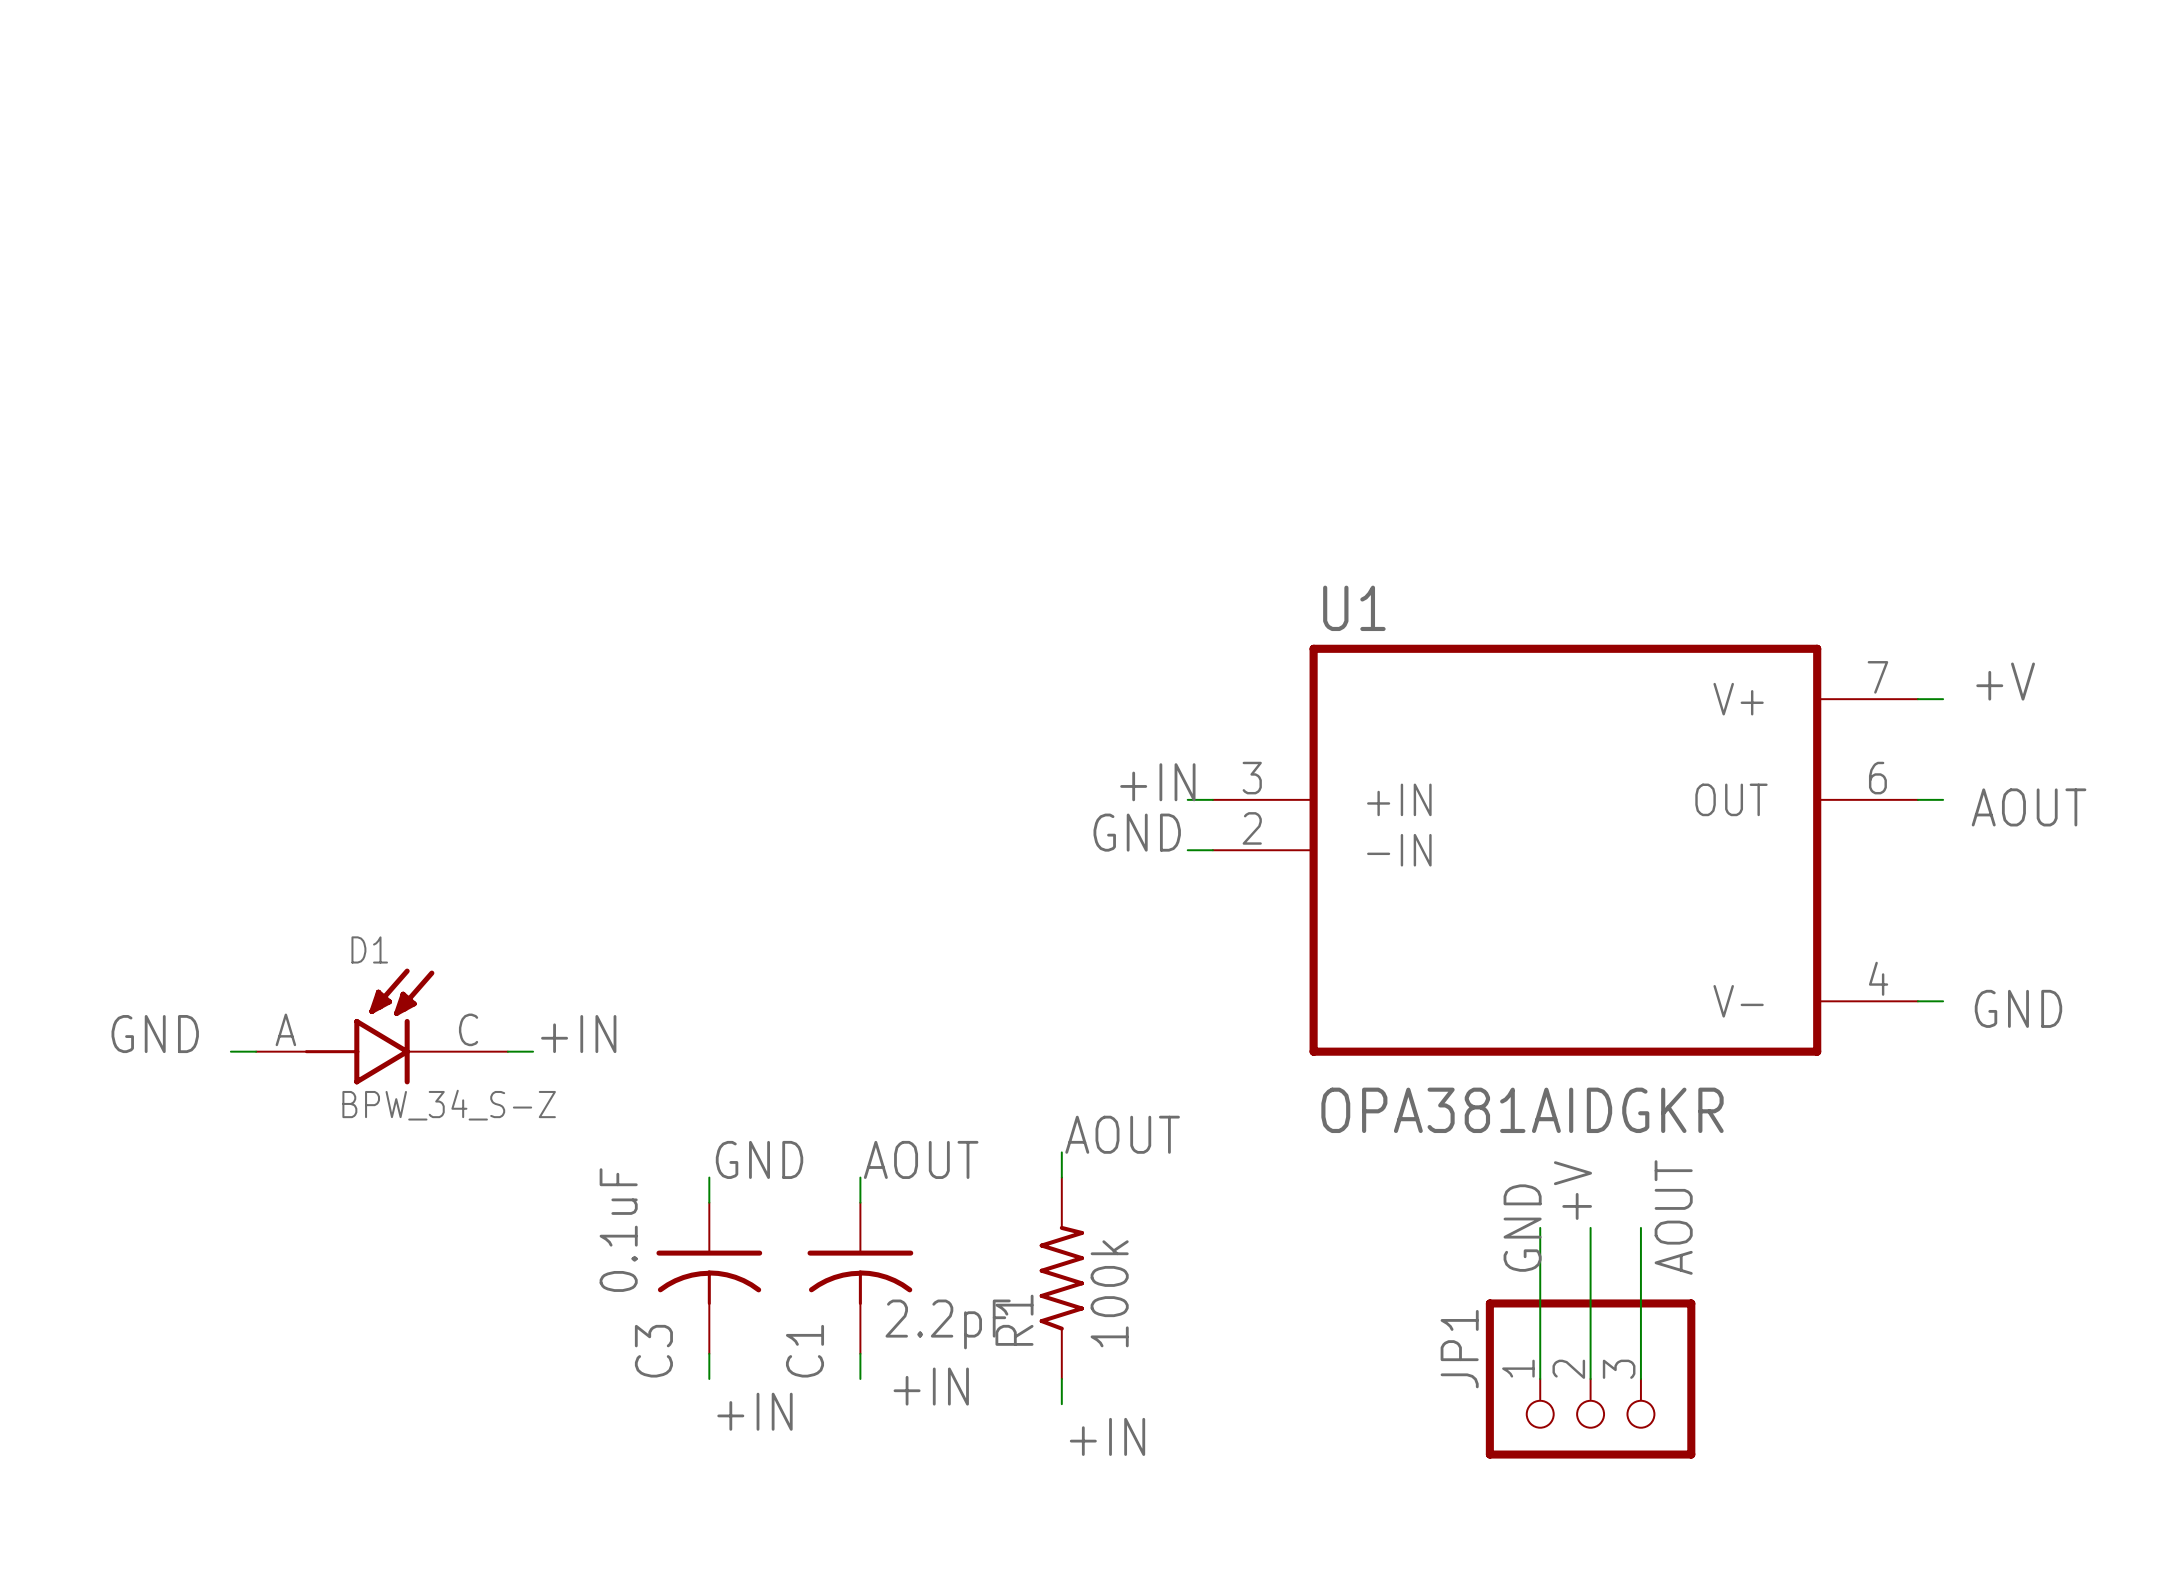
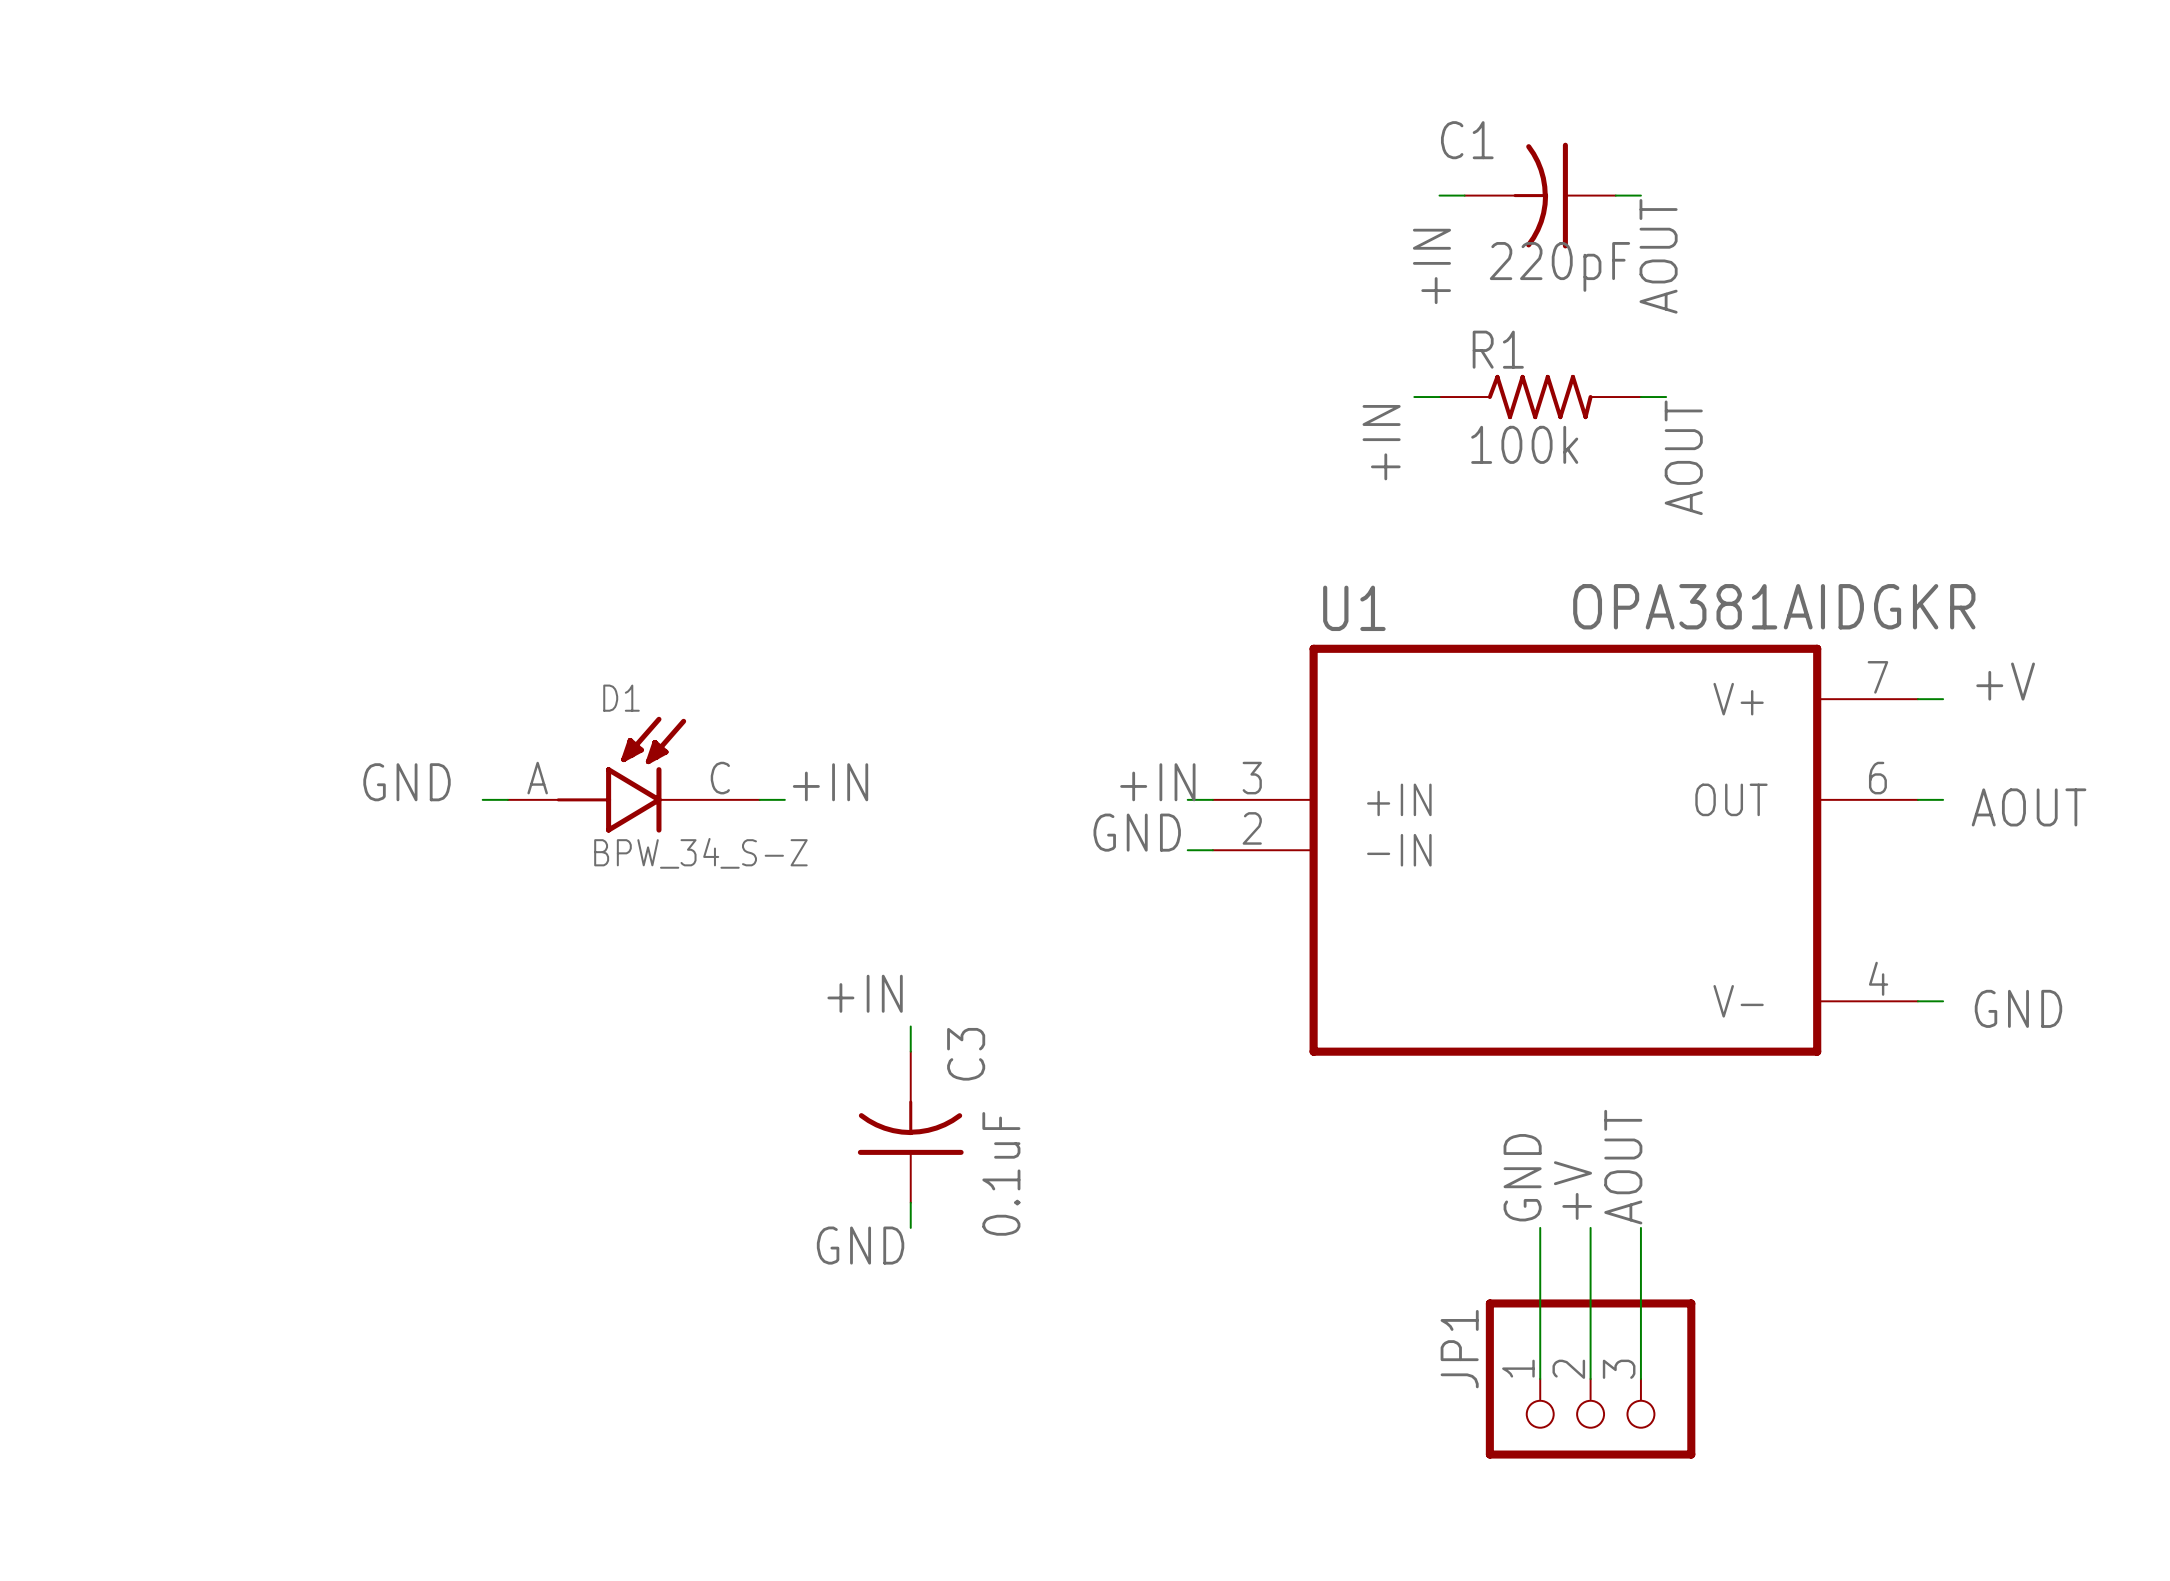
wire: none -> (1439, 195) (1464, 195)
wire: none -> (1615, 195) (1640, 195)
label: none -> AOUT (1658, 256)
label: none -> +IN (1431, 266)
wire: none -> (1414, 397) (1439, 397)
wire: none -> (1640, 397) (1666, 397)
label: none -> +IN (1381, 442)
label: none -> AOUT (1683, 457)
label: none -> GND (407, 782)
label: none -> +IN (830, 782)
label: none -> +IN (865, 993)
D1 position: (381, 1026) -> (633, 774)
label: GND (155, 1034) -> none
label: +IN (578, 1034) -> none
wire: (230, 1051) (256, 1051) -> (482, 799) (507, 799)
wire: (507, 1051) (533, 1051) -> (759, 799) (784, 799)
U1 value position: OPA381AIDGKR (1522, 1110) -> OPA381AIDGKR (1774, 606)
label: AOUT (1122, 1134) -> none
wire: (1061, 1152) (1061, 1177) -> none
label position: GND (759, 1159) -> GND (860, 1245)
label: AOUT (921, 1159) -> none
wire: (709, 1177) (709, 1202) -> none
wire: (860, 1177) (860, 1202) -> (910, 1026) (910, 1051)
label position: AOUT (1673, 1217) -> AOUT (1623, 1167)
label position: GND (1522, 1228) -> GND (1522, 1177)
C3 rotation: 0° (709, 1277) -> 180° (910, 1127)
C1 rotation: 0° (860, 1277) -> 90° clockwise (1540, 195)
C3 position: (709, 1278) -> (910, 1127)
C1 position: (860, 1278) -> (1540, 195)
R1 rotation: 0° (1061, 1278) -> 90° clockwise (1540, 397)
R1 position: (1061, 1278) -> (1540, 397)
C1 value: 2.2pF (948, 1324) -> 220pF (1559, 266)
wire: (709, 1353) (709, 1379) -> none
wire: (860, 1353) (860, 1379) -> (910, 1202) (910, 1227)
wire: (1061, 1379) (1061, 1404) -> none
label: +IN (931, 1386) -> none
label: +IN (754, 1411) -> none
label: +IN (1107, 1436) -> none

